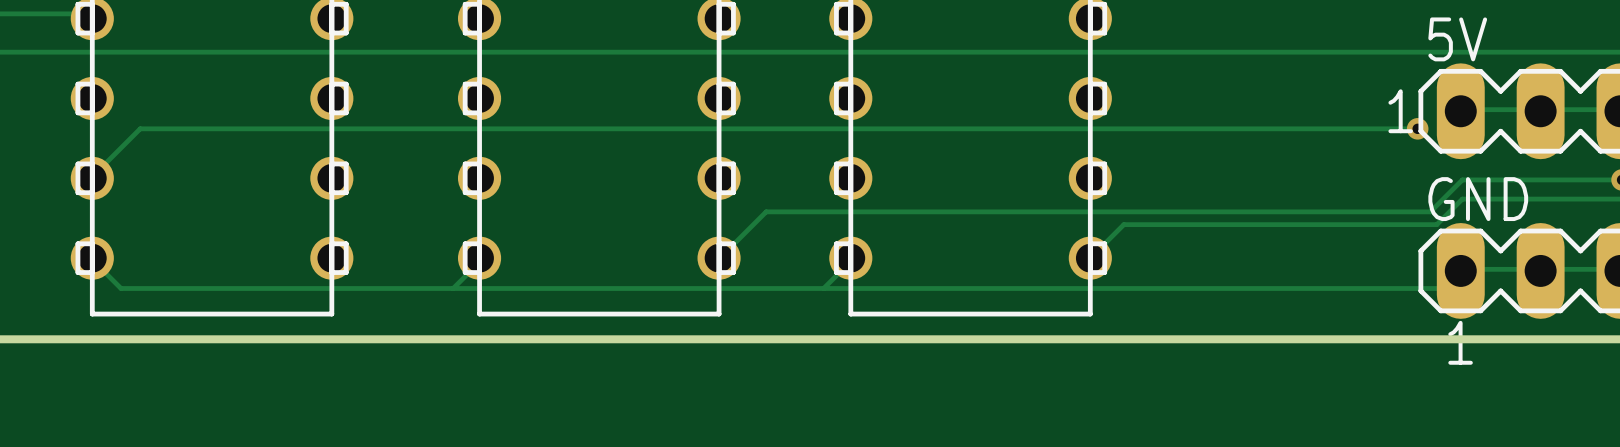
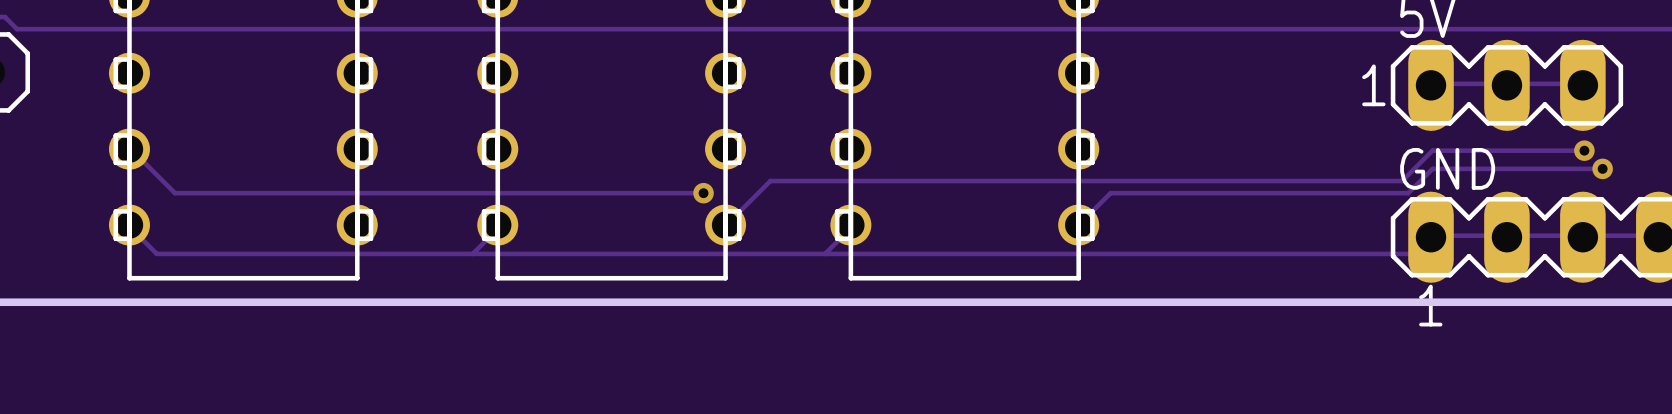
track: (1417, 128) (140, 128) (92, 178) -> (703, 193) (175, 193) (129, 149)
via: (1417, 128) -> none
via: none -> (703, 193)

